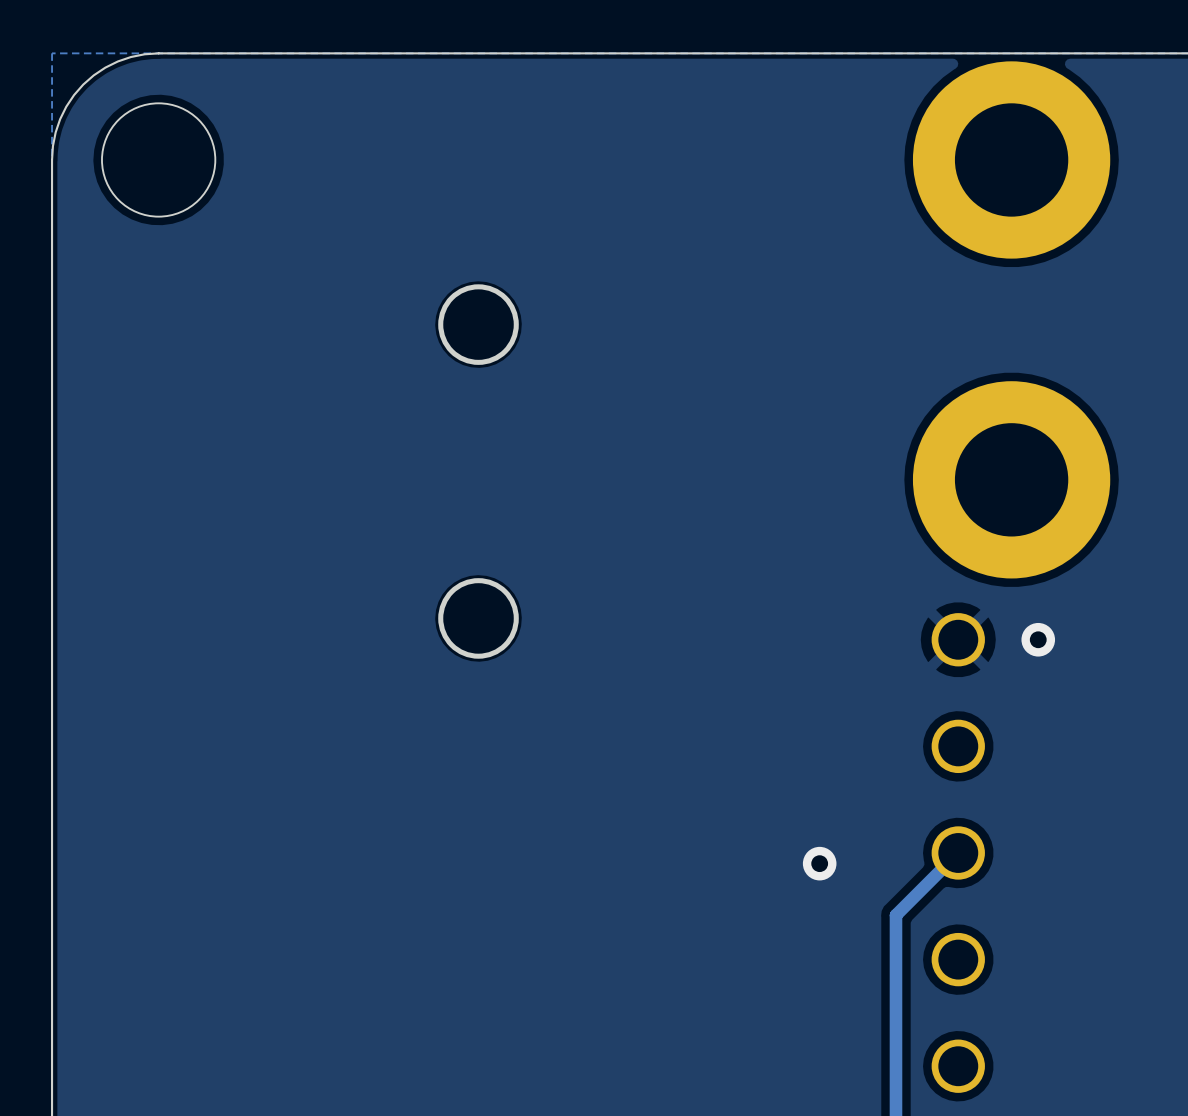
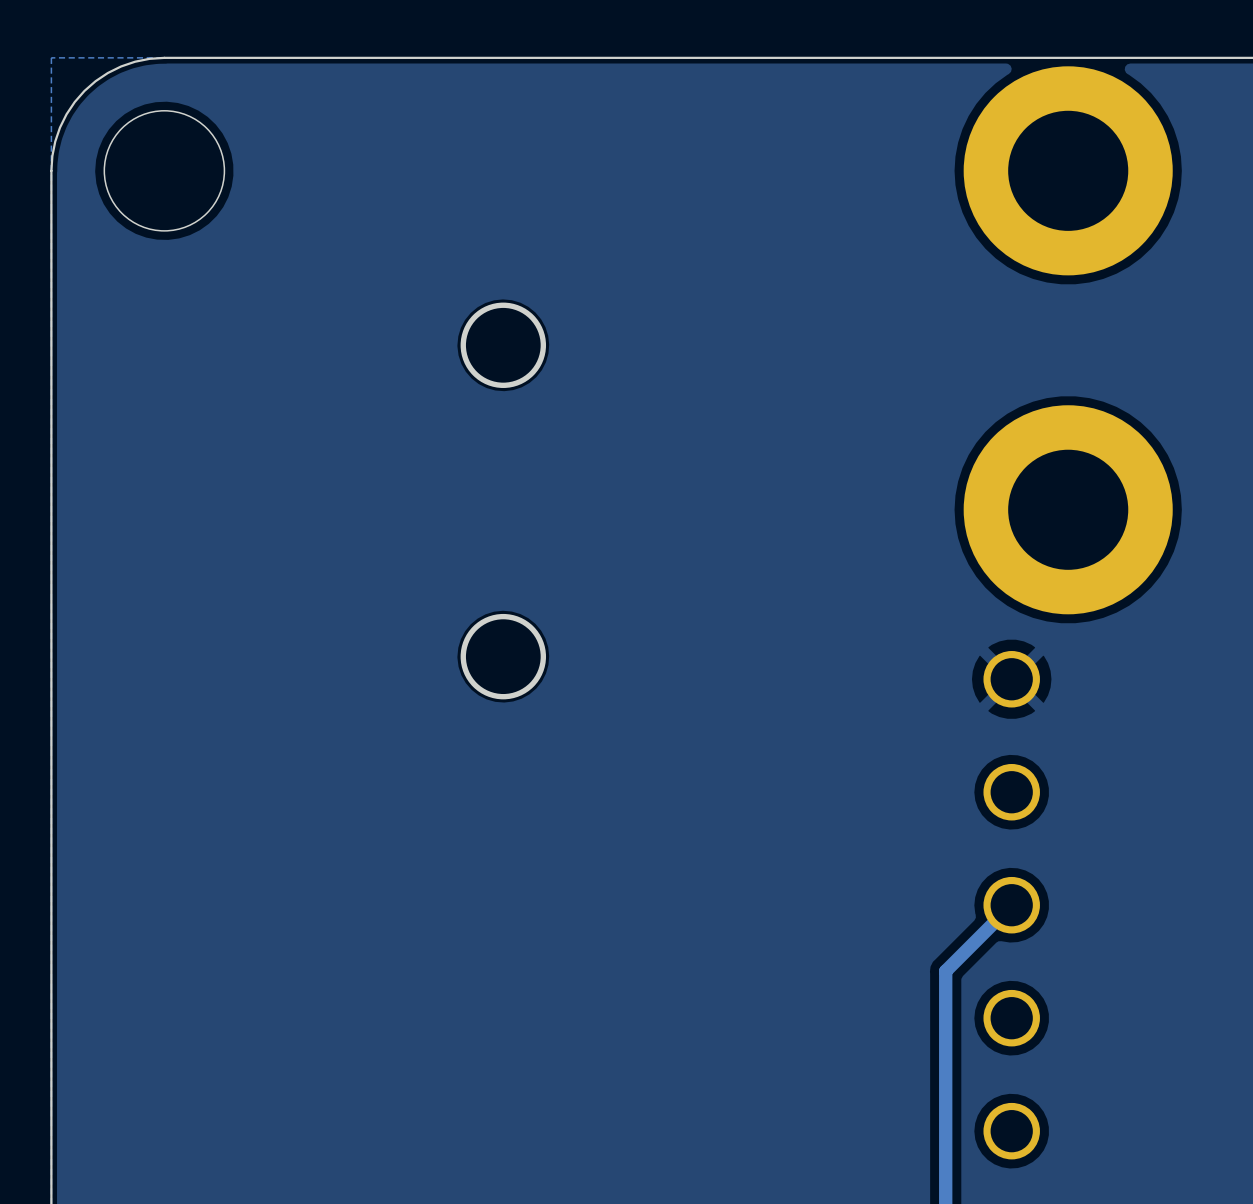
via: (1038, 639) -> none
via: (819, 863) -> none

